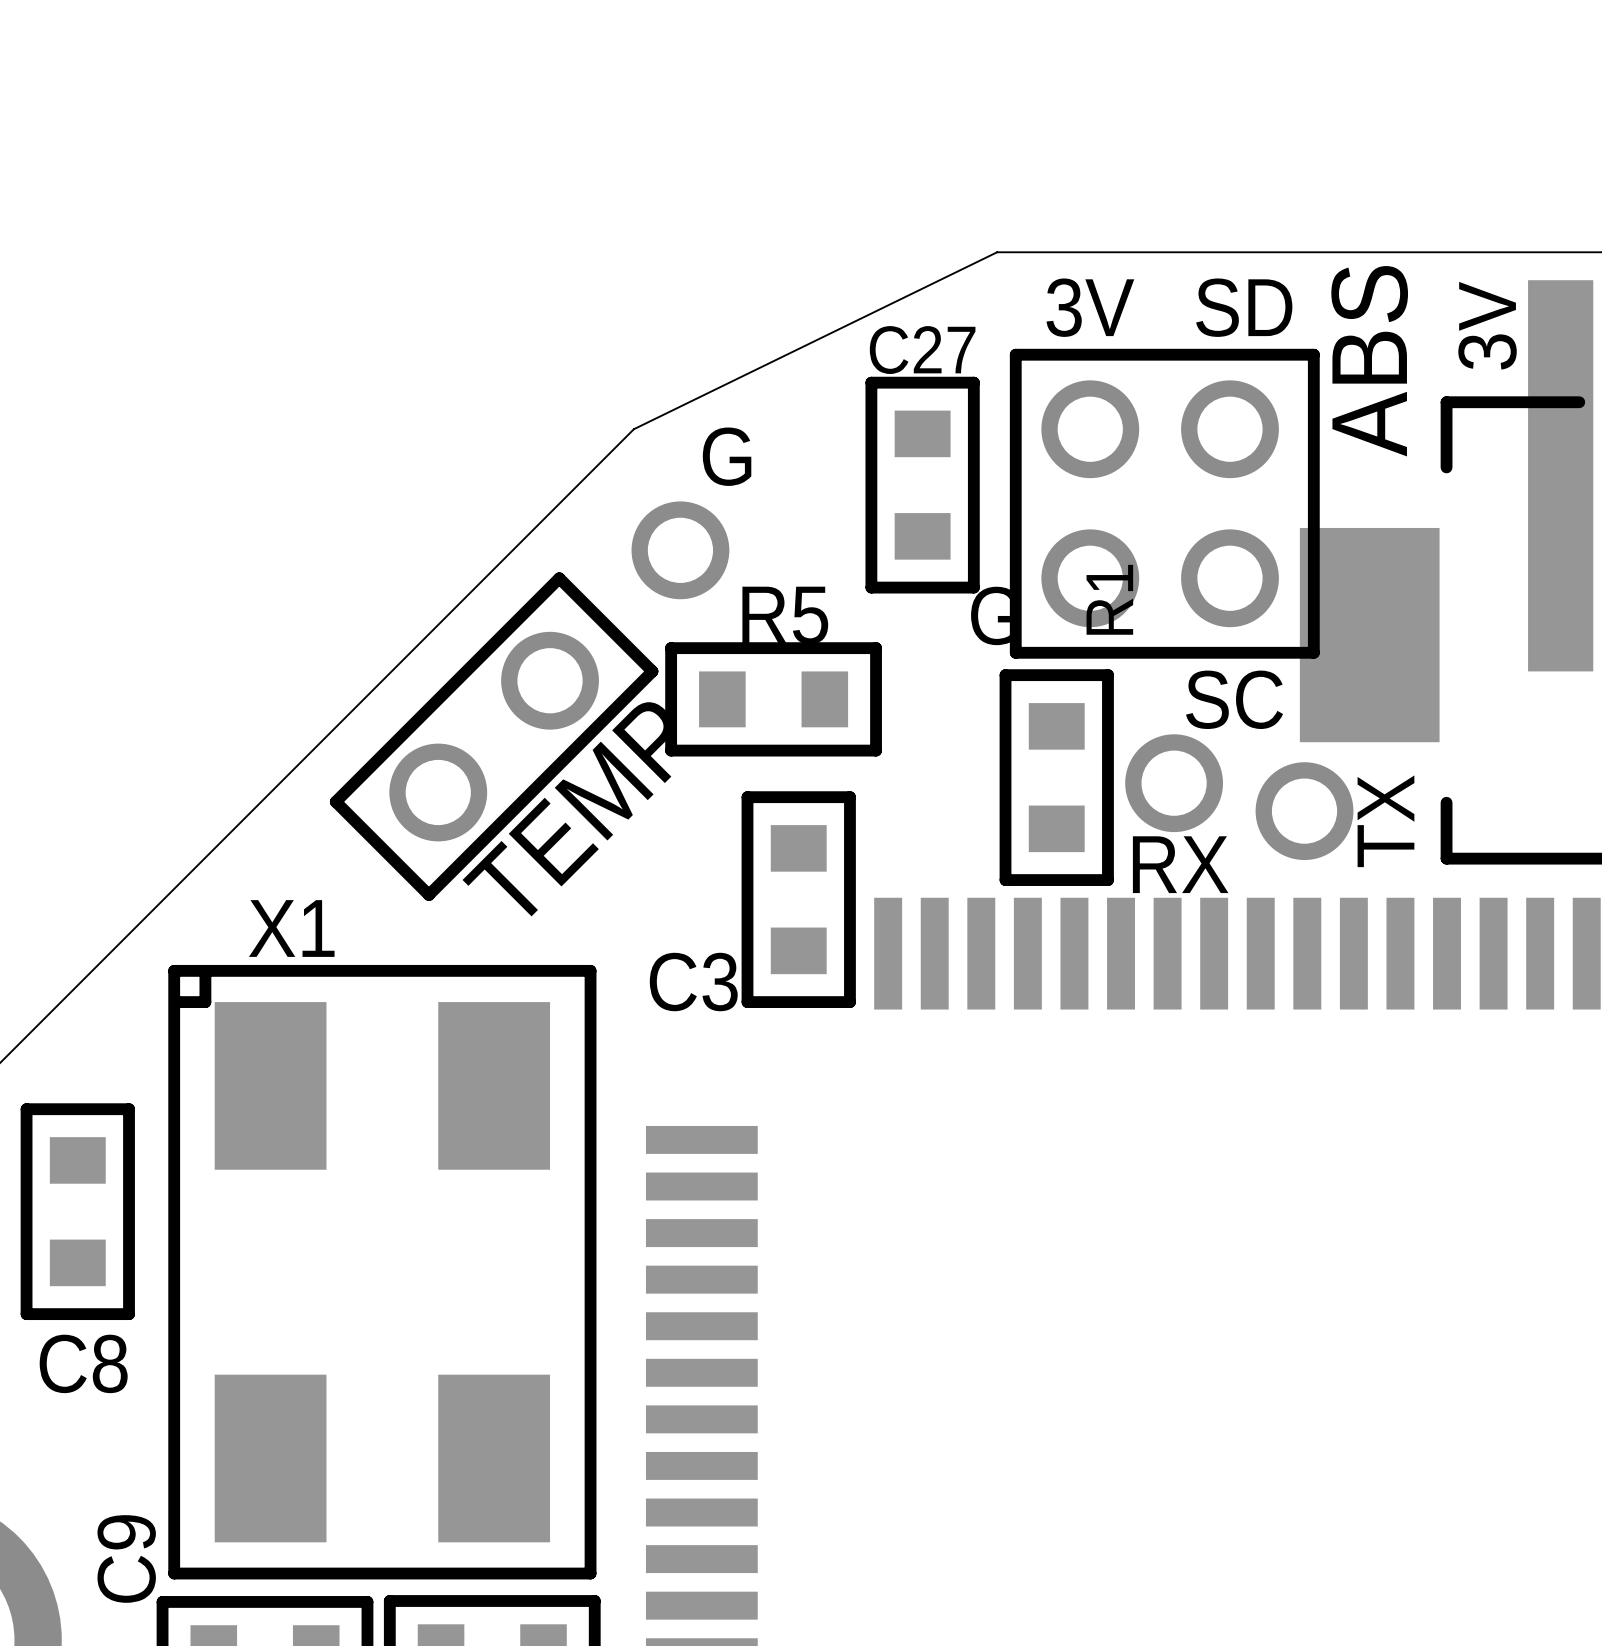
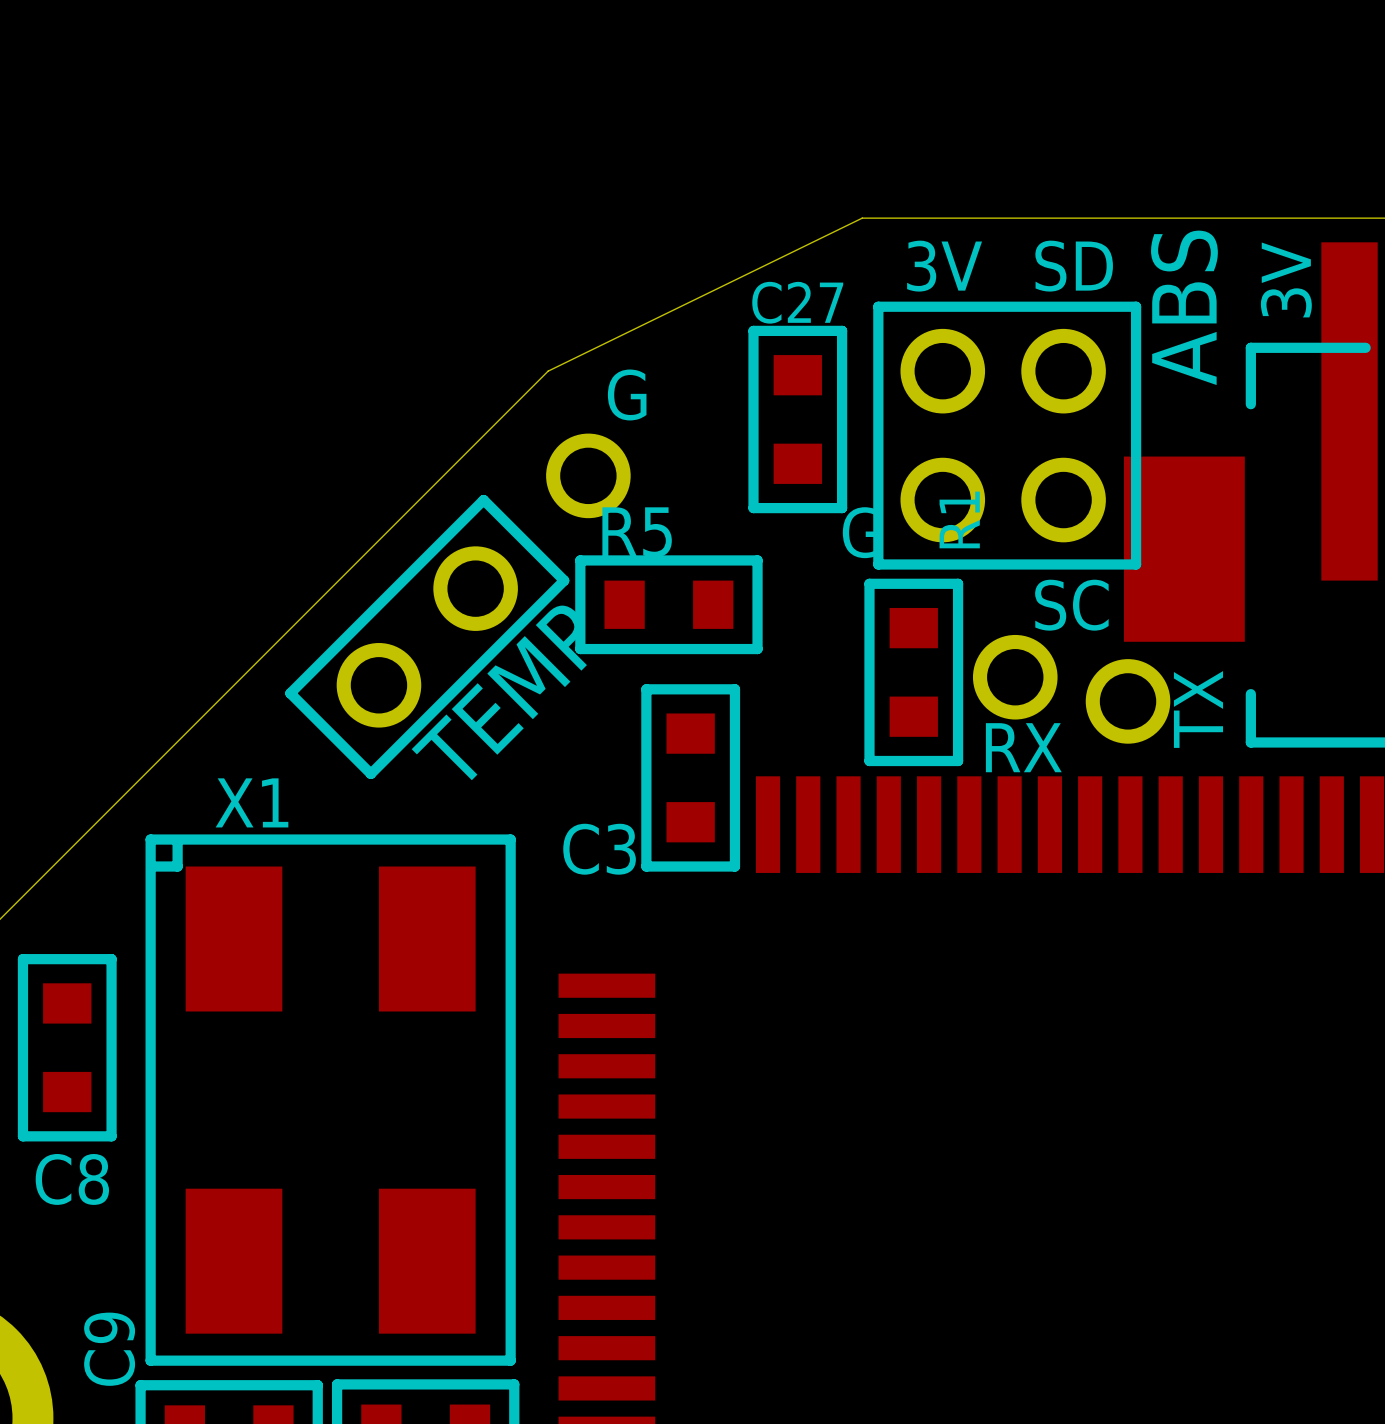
R5 name position: R5 (785, 615) -> R5 (637, 532)

